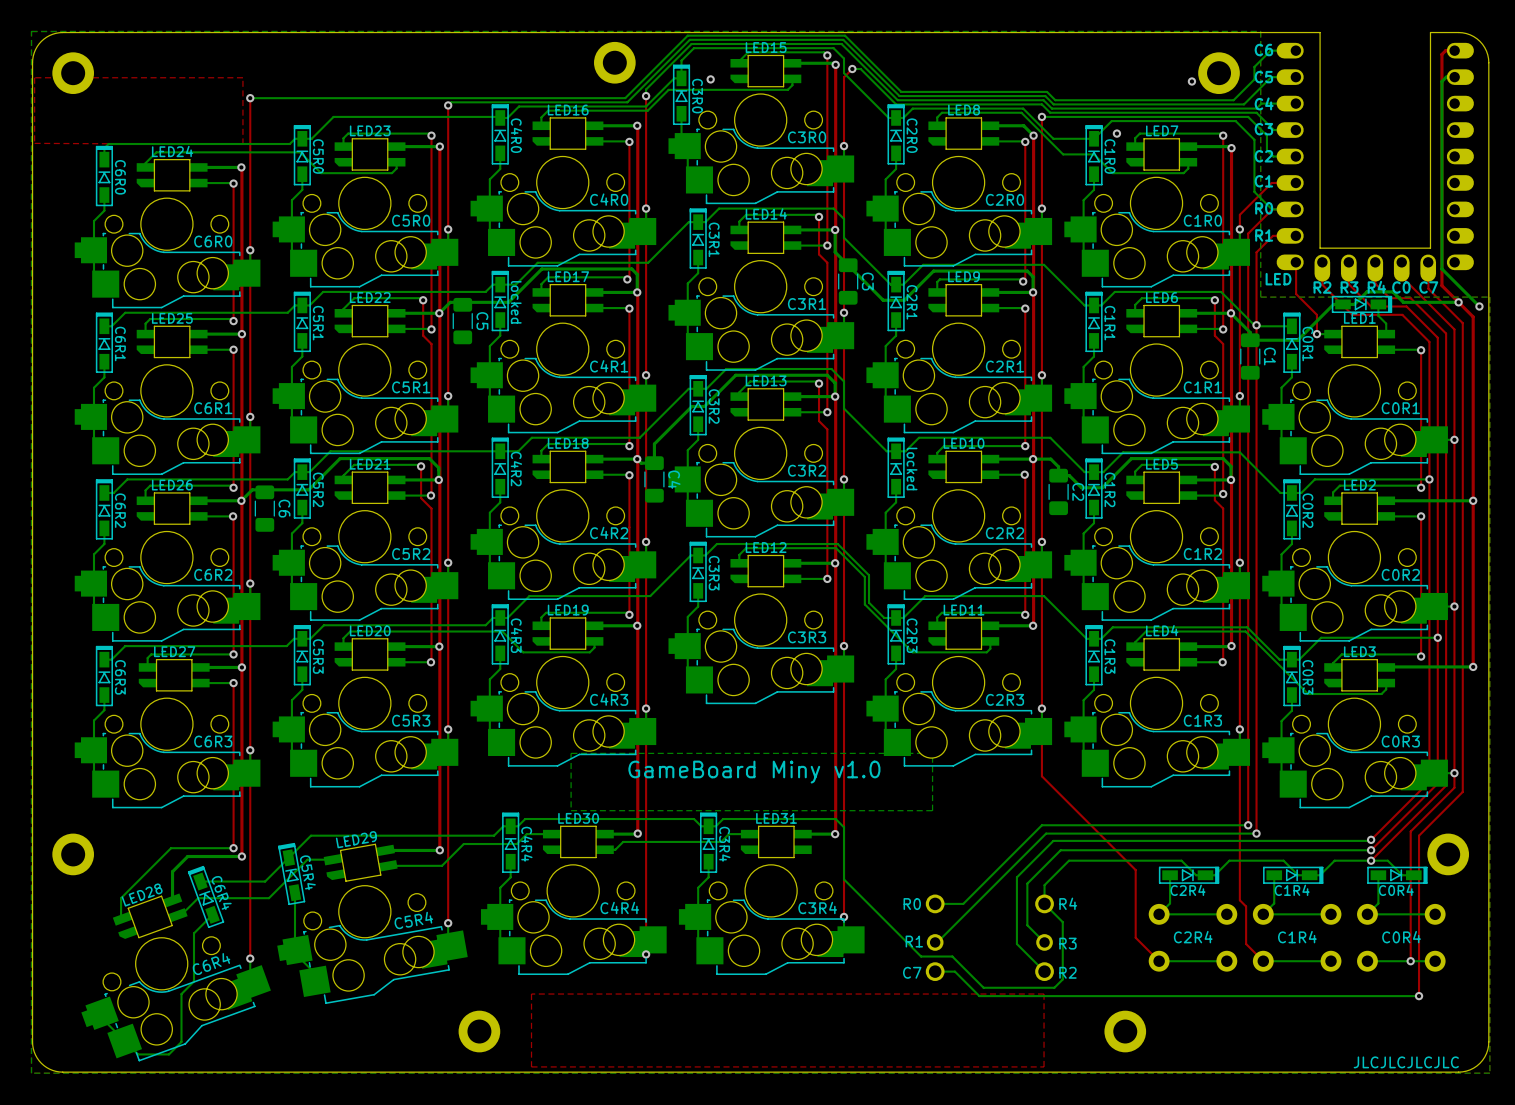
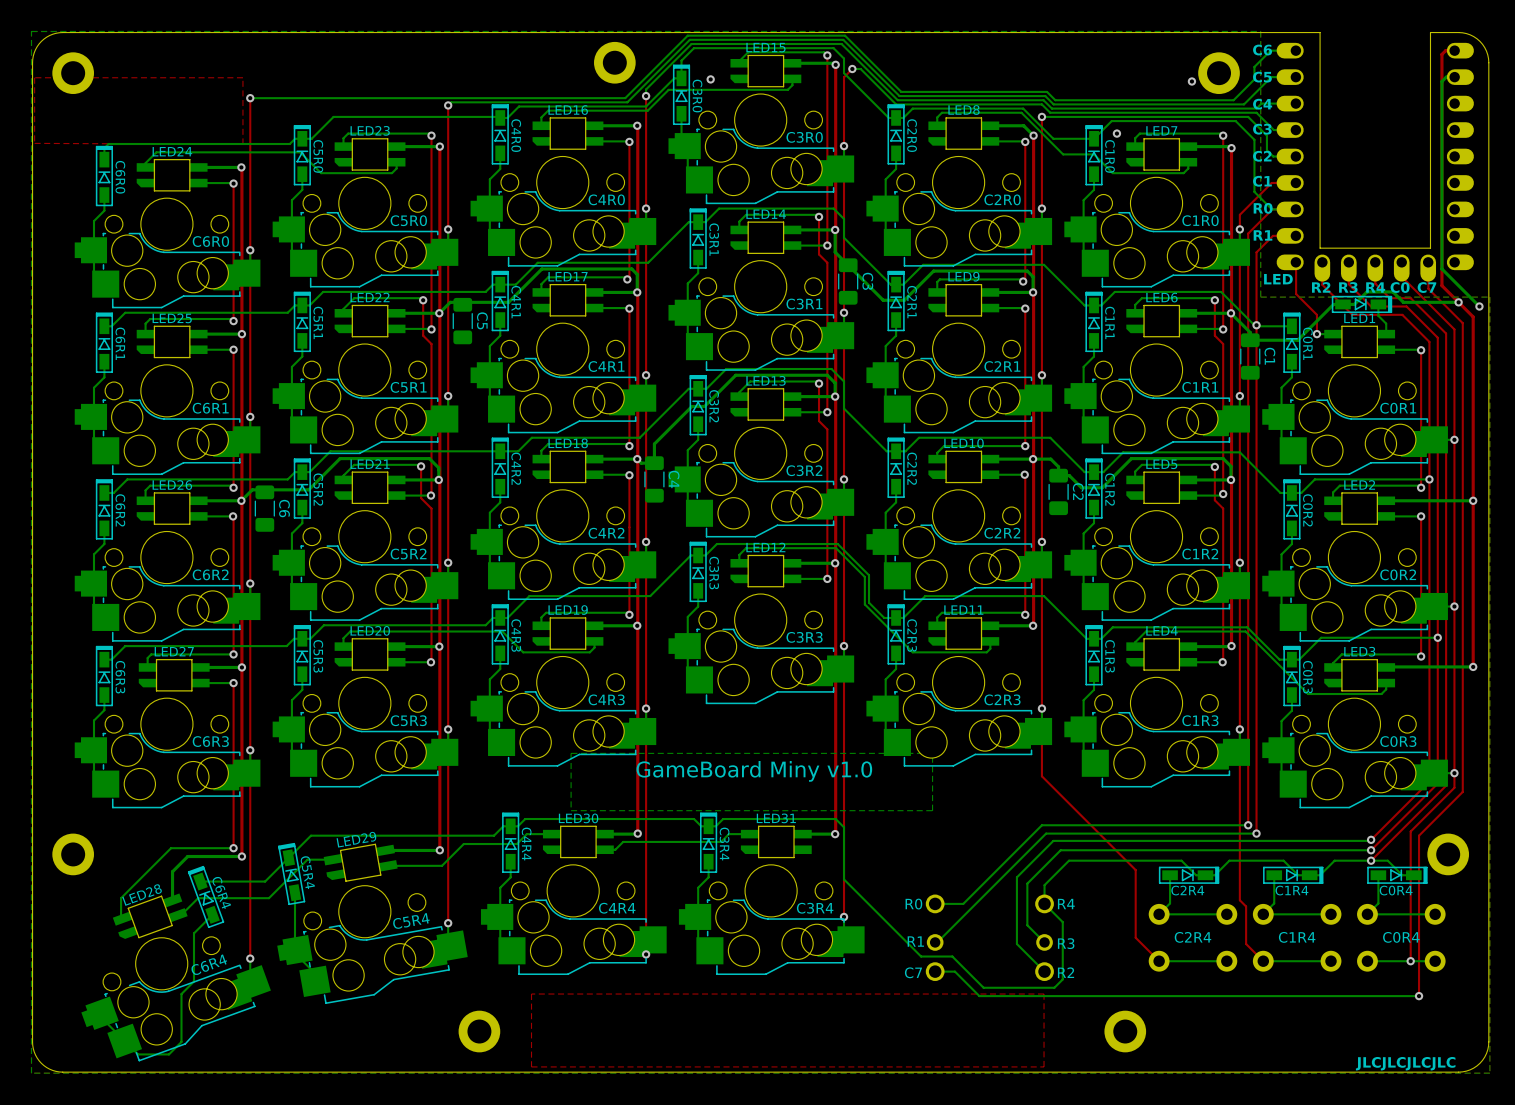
part text: locked (516, 302) -> C4R1 (516, 302)
part text: locked (912, 469) -> C2R2 (912, 468)

